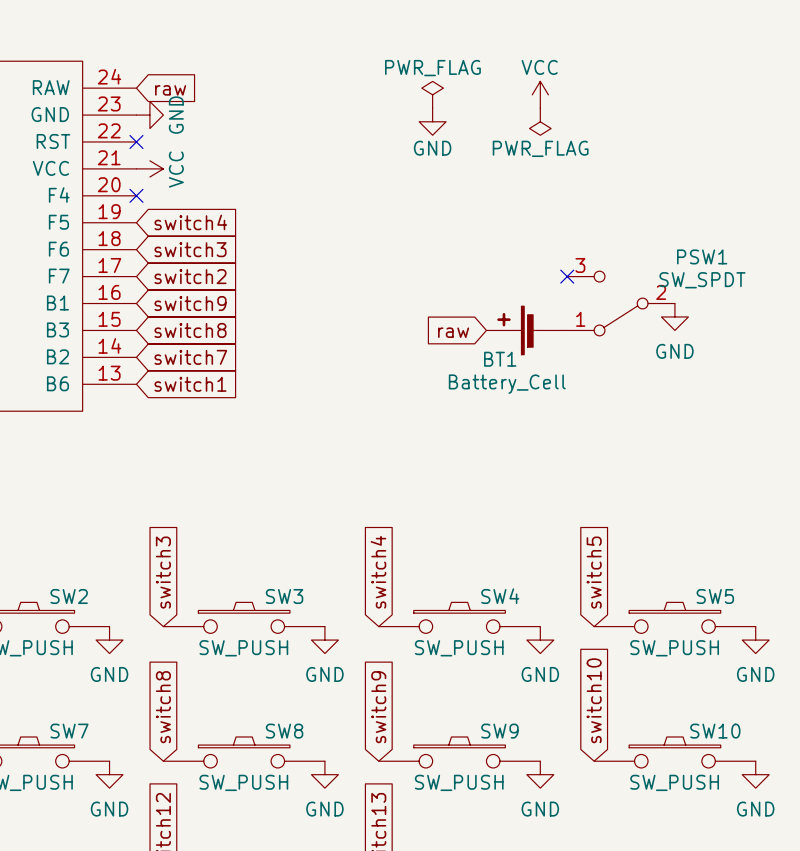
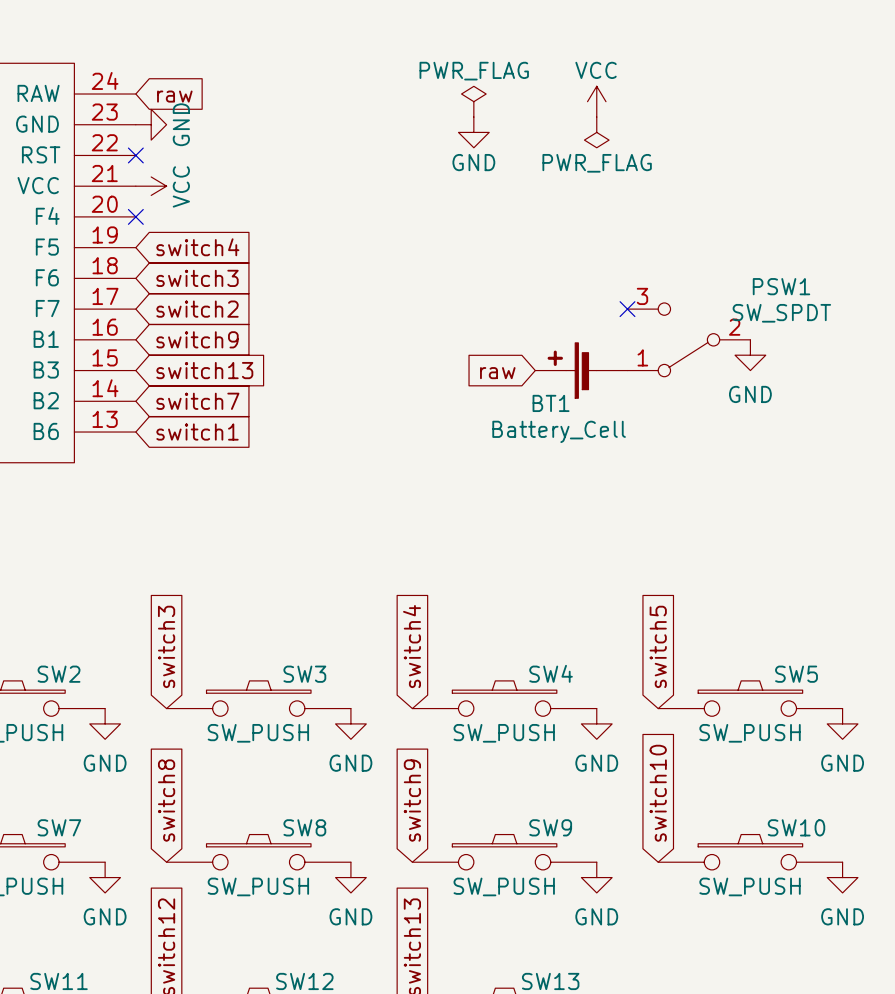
global label: switch8 (190, 330) -> switch13 (204, 370)

